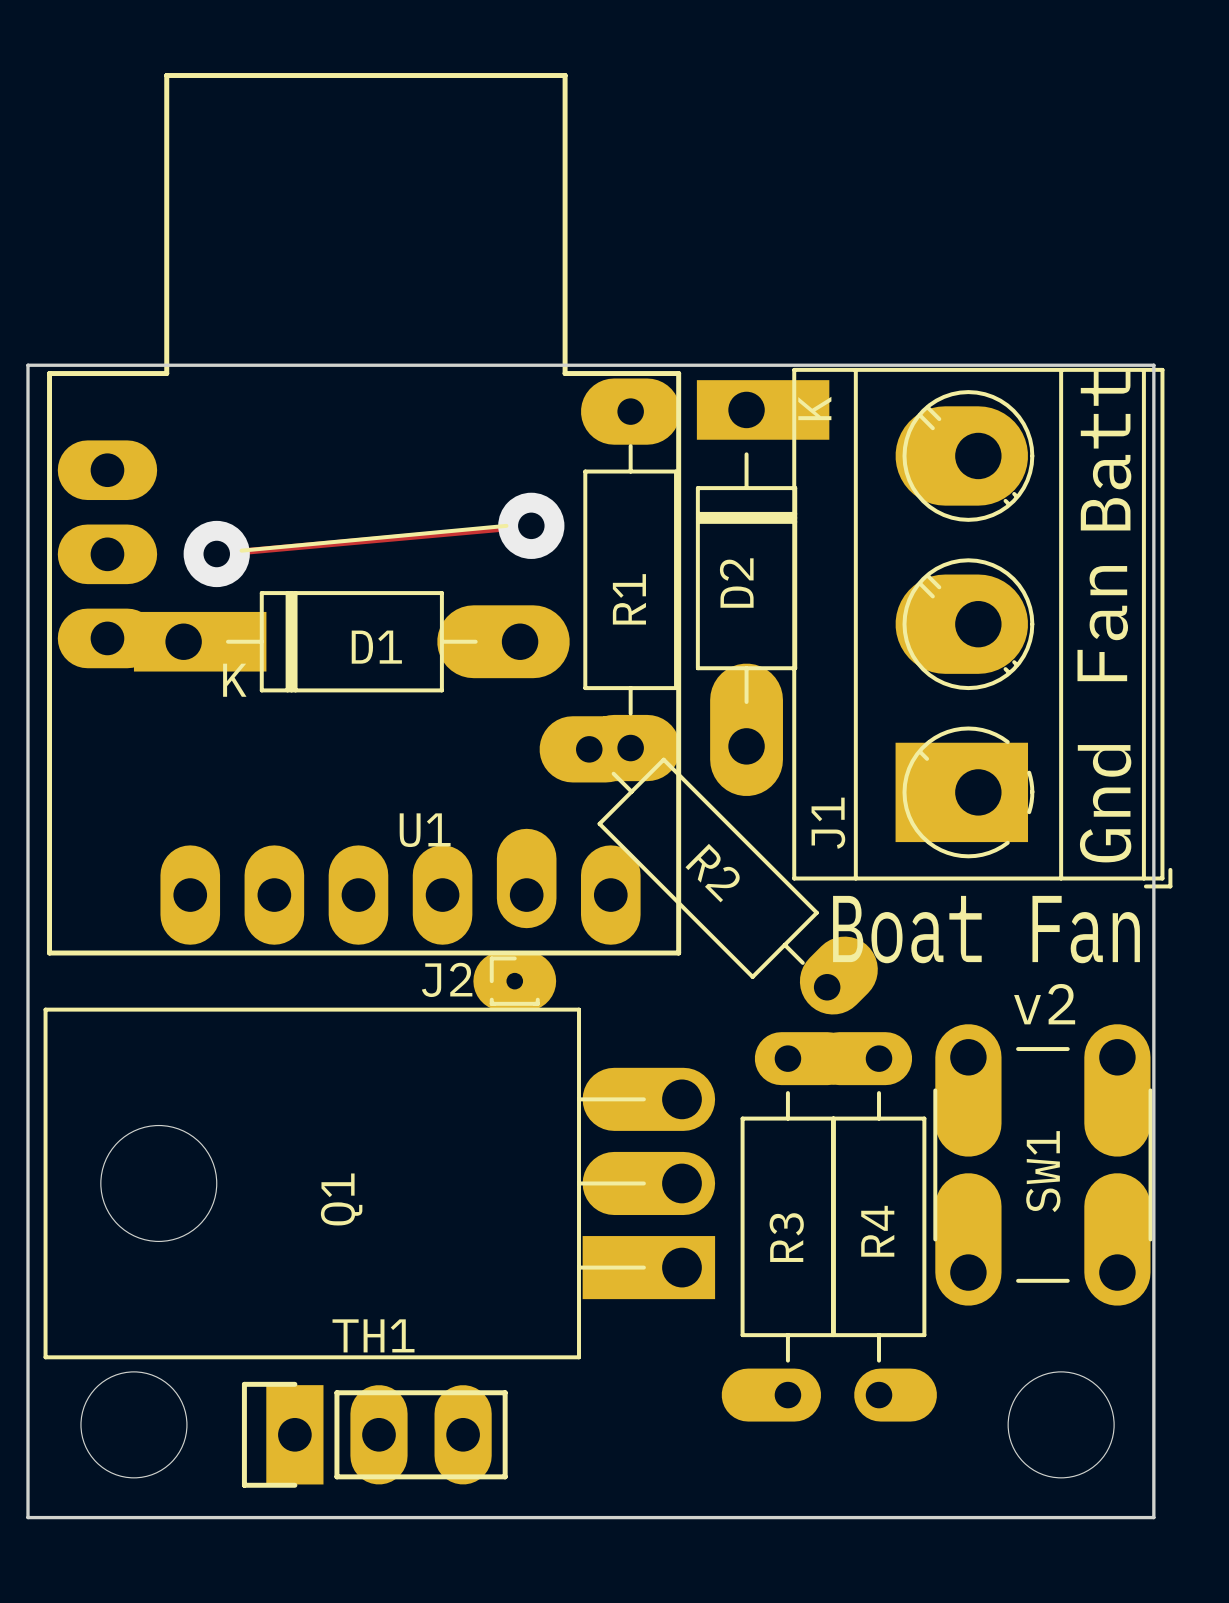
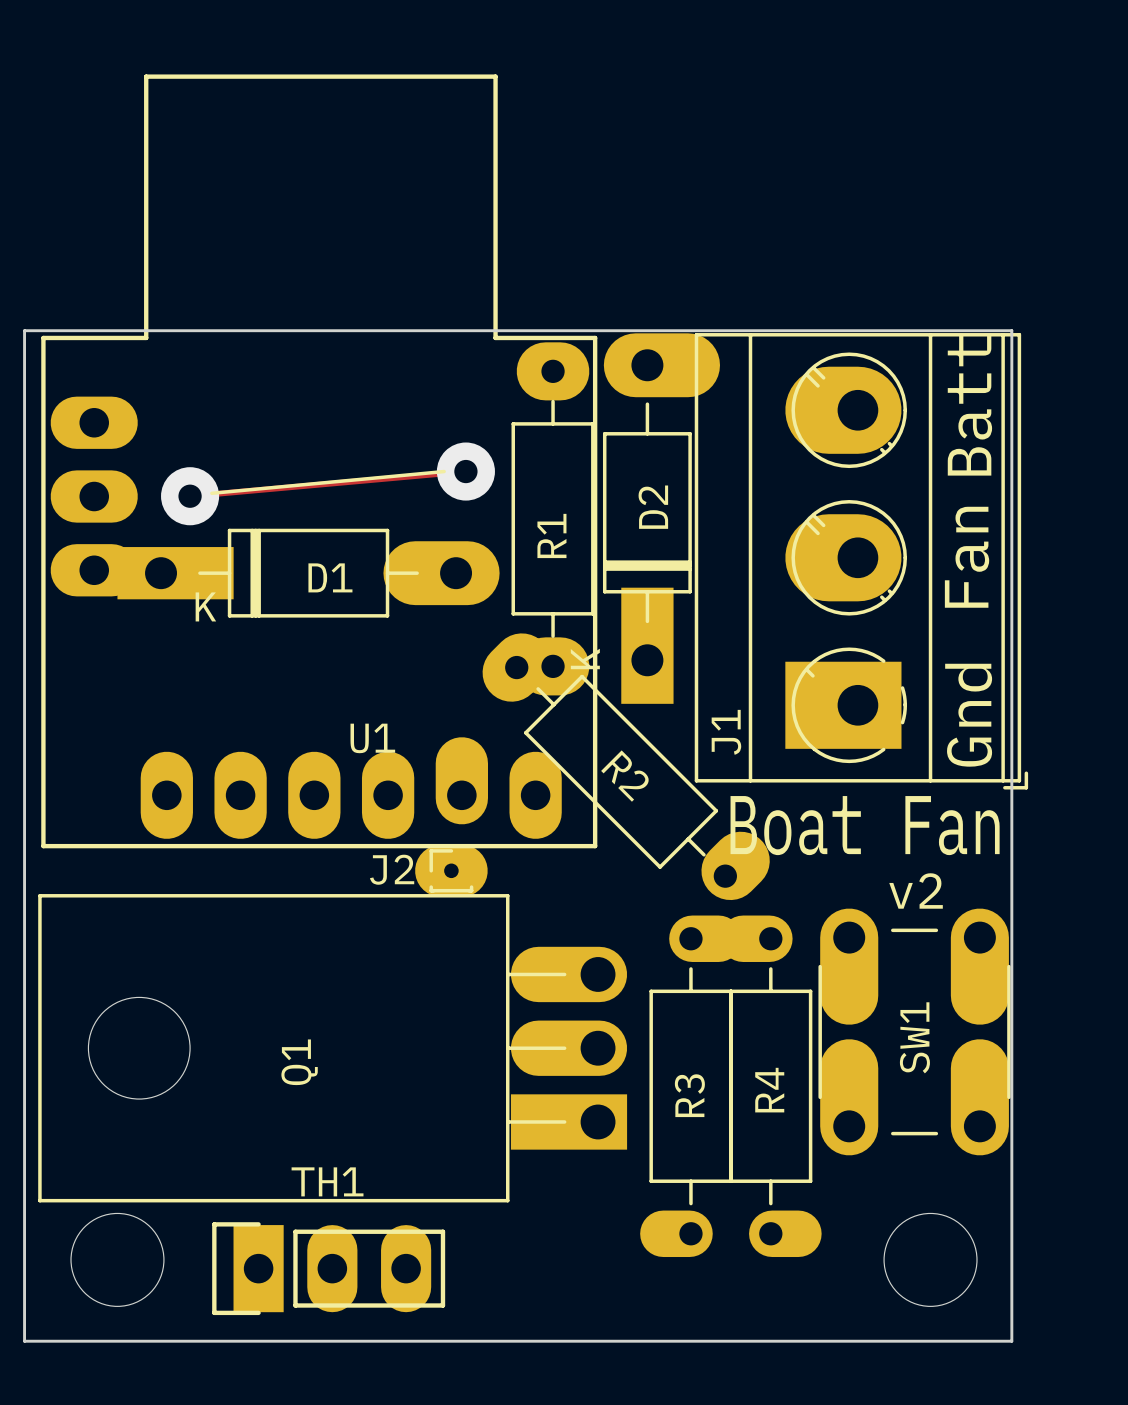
R1 footprint: [580, 378, 681, 782] -> [511, 342, 595, 696]
D2 footprint: [695, 380, 830, 797] -> [602, 333, 721, 704]
R2 footprint: [539, 716, 878, 1015] -> [482, 633, 770, 901]
R3 footprint: [721, 1032, 855, 1422] -> [640, 915, 742, 1258]
R4 footprint: [812, 1032, 937, 1422] -> [720, 915, 822, 1258]

